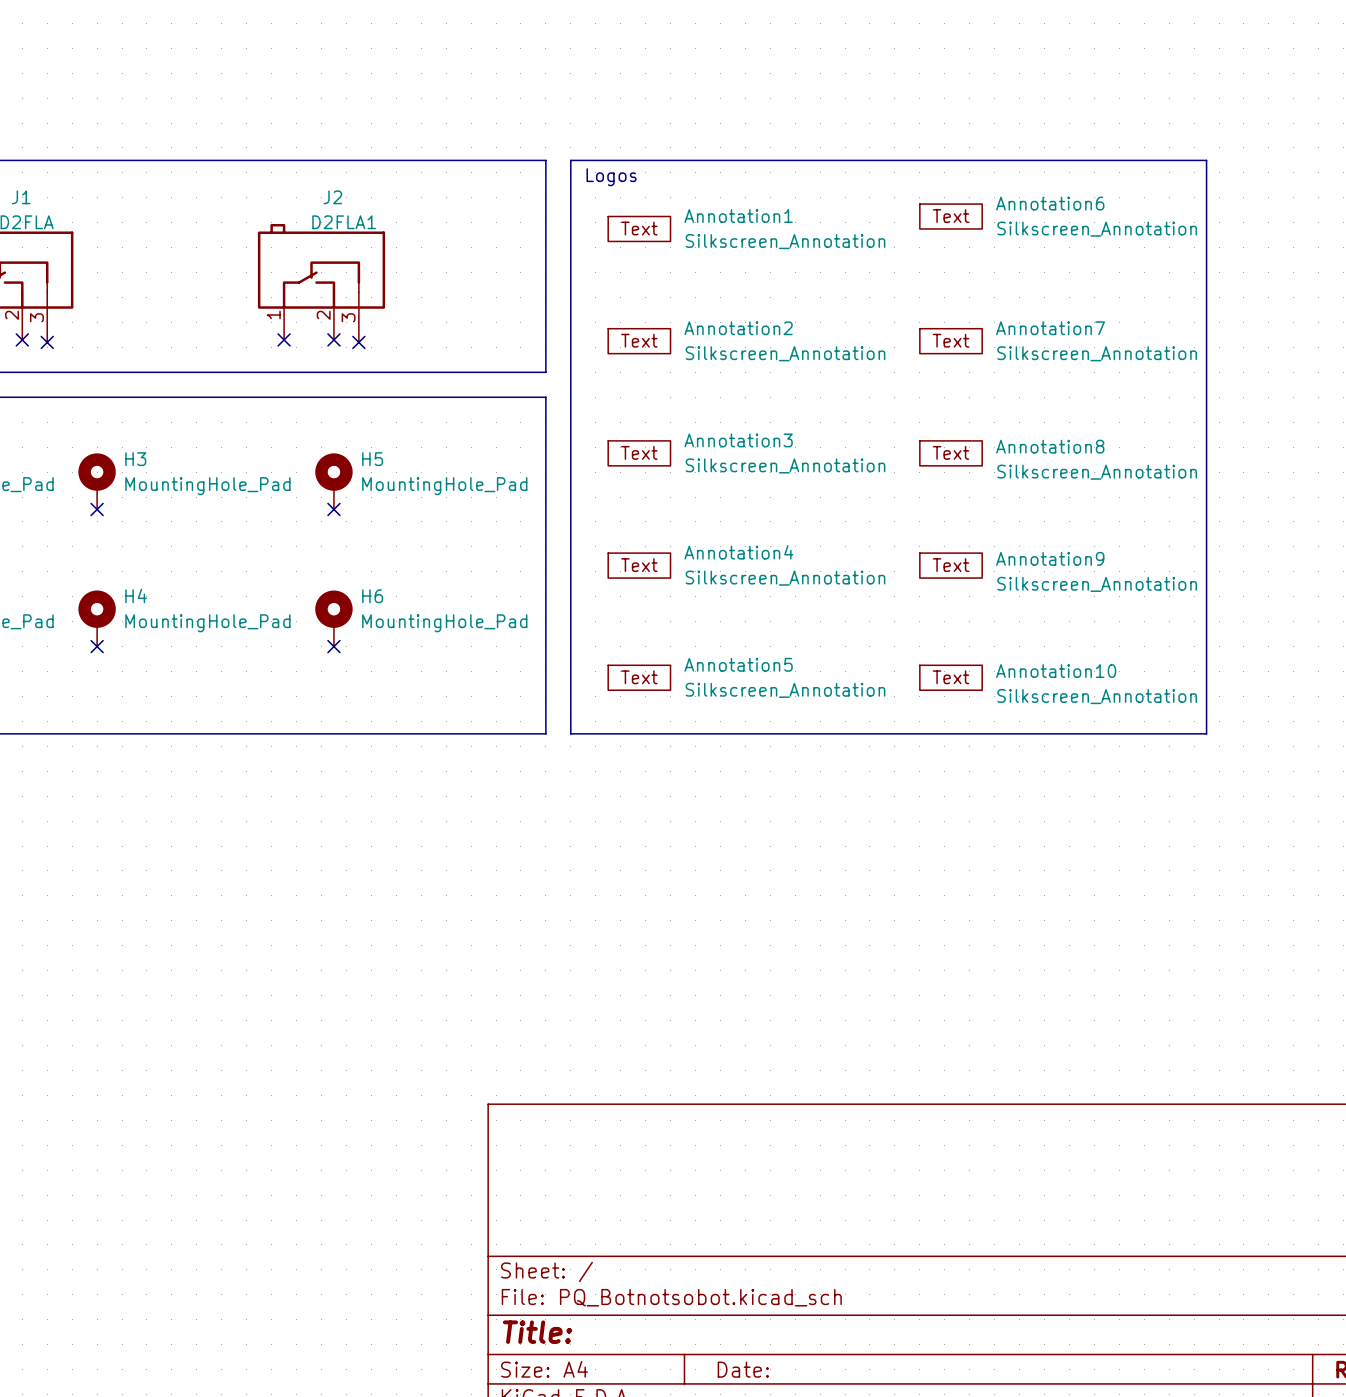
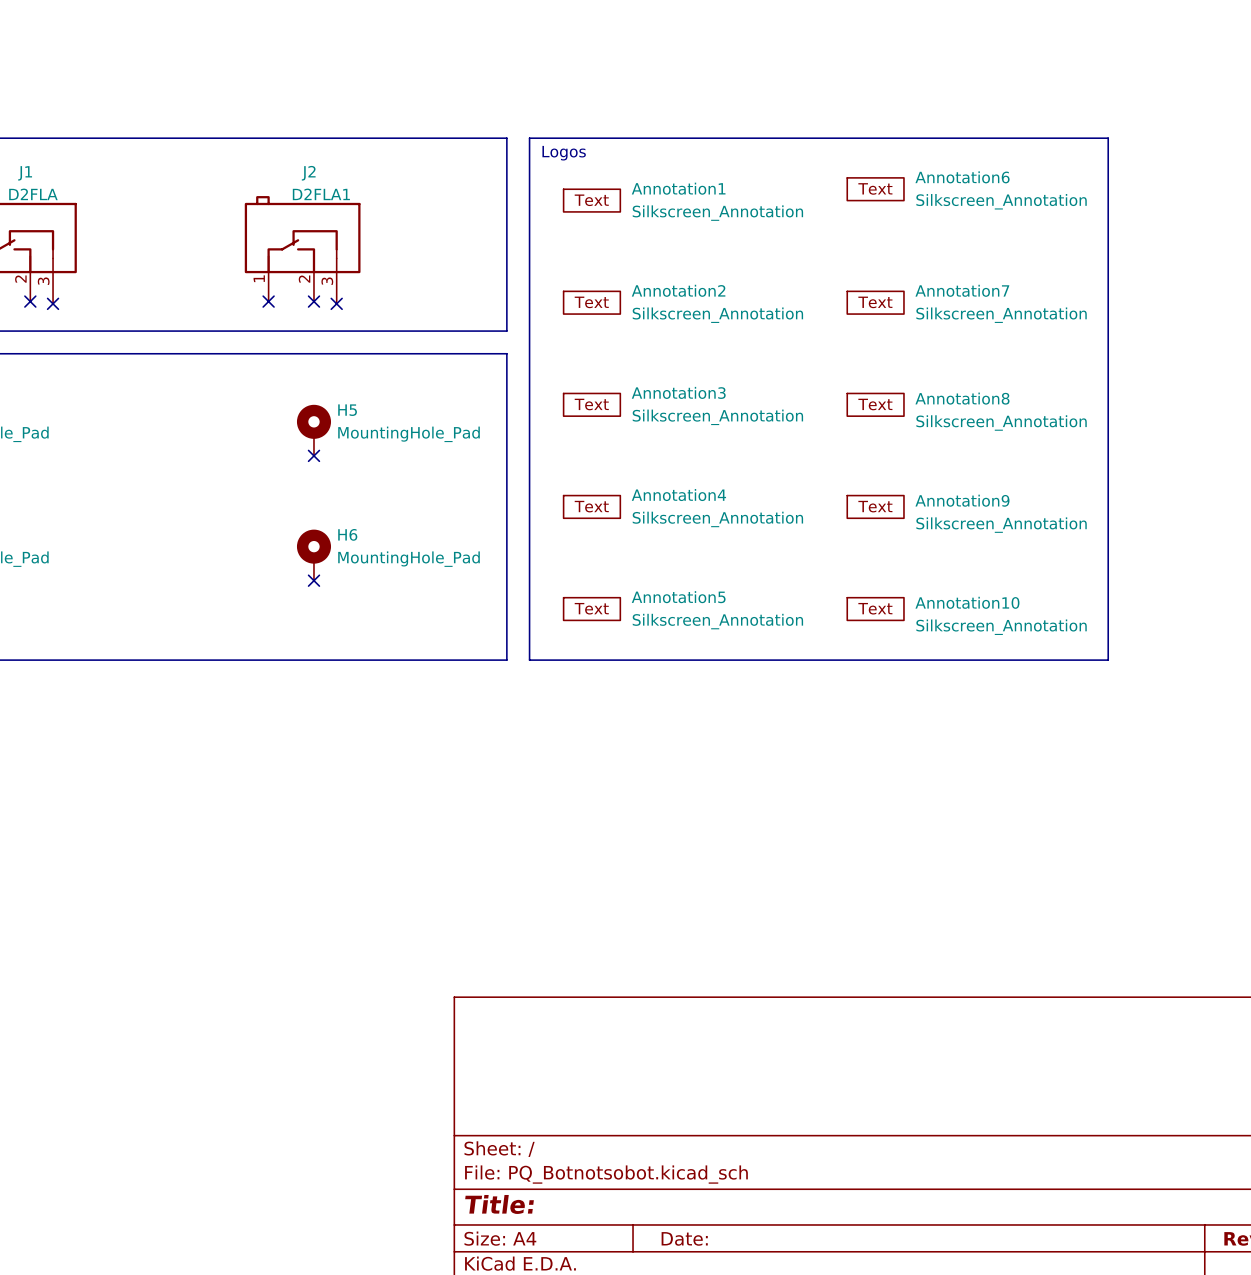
H3: MountingHole_Pad (97, 481) -> none
no-connect mark: (97, 509) -> none
H4: MountingHole_Pad (97, 618) -> none
no-connect mark: (97, 646) -> none

